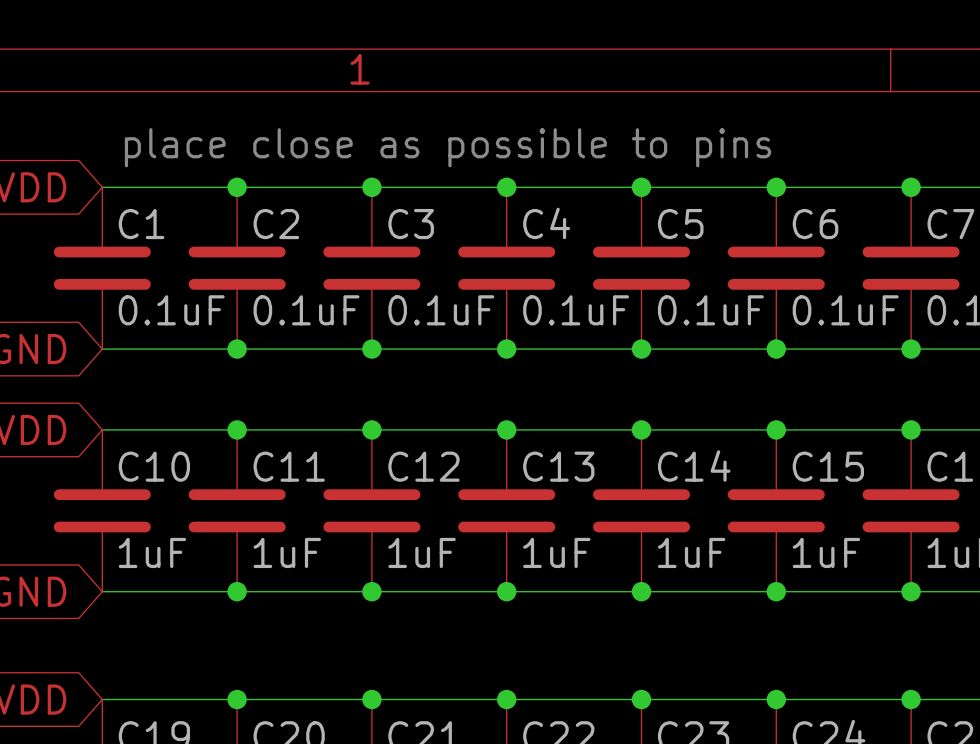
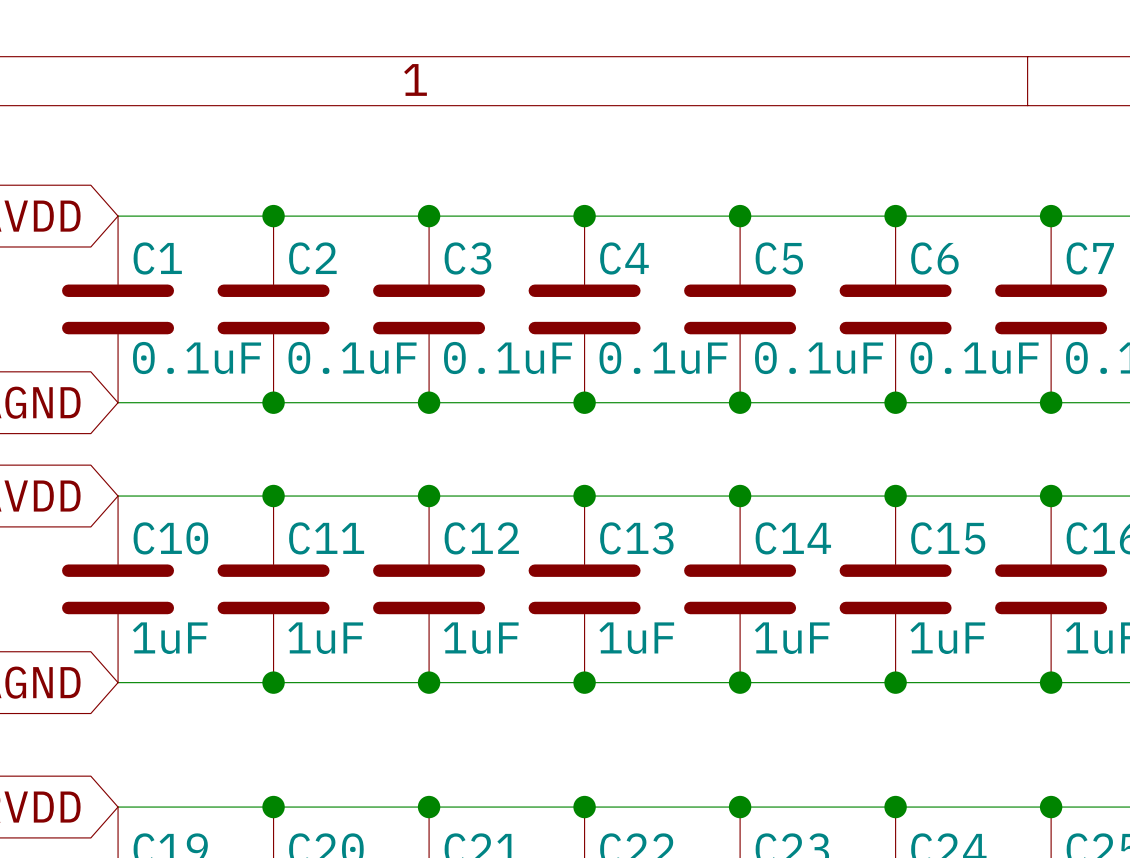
text: place close as possible to pins (448, 147) -> none

